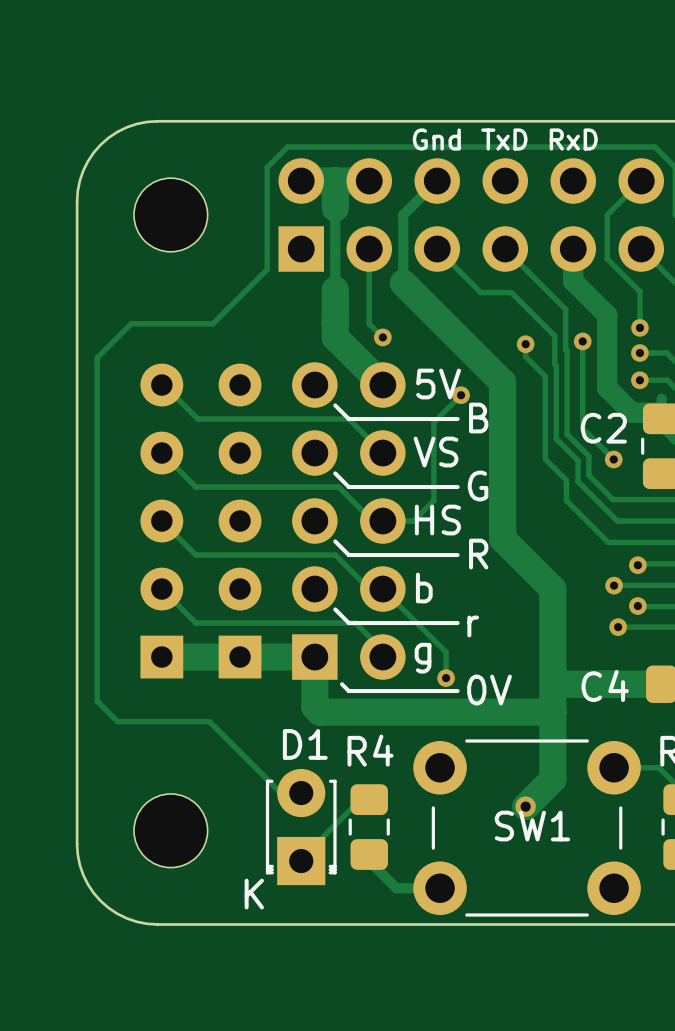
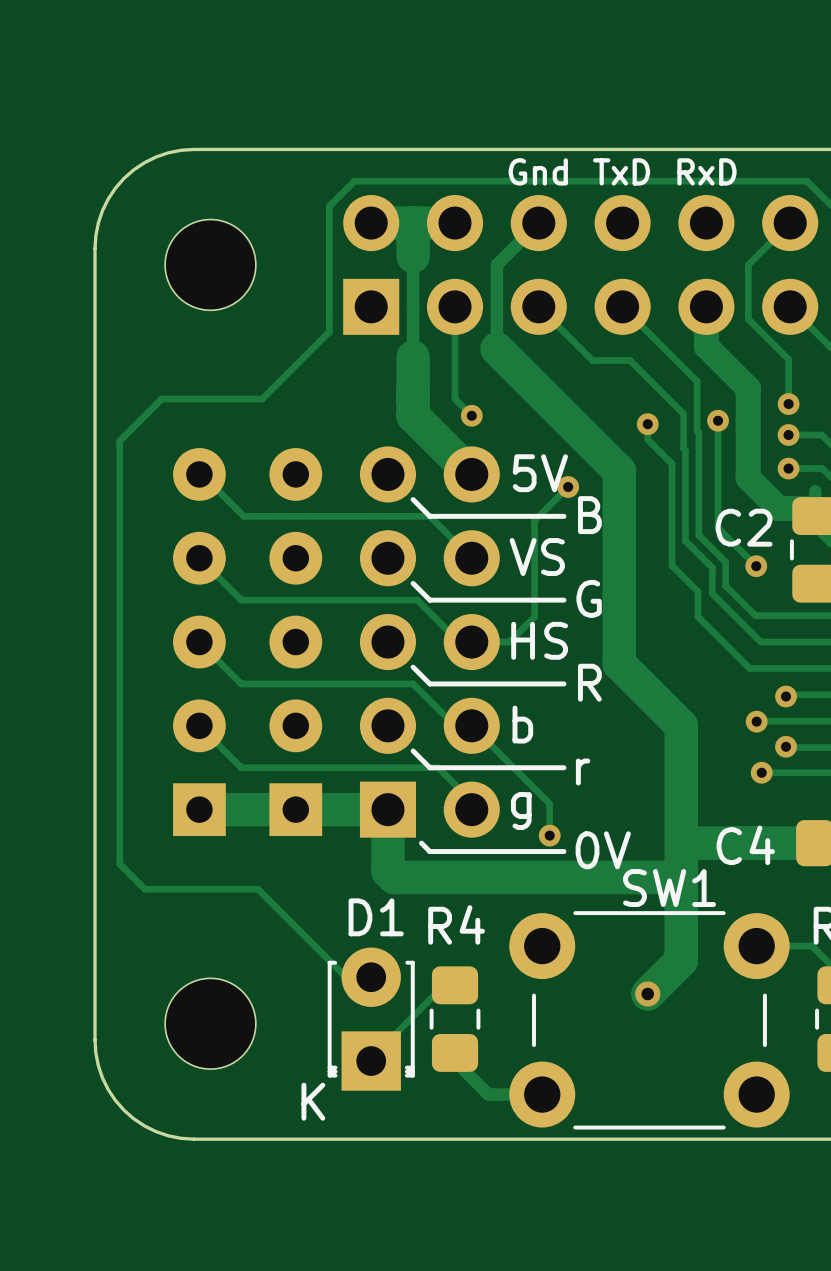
SW1 name position: SW1 (532, 826) -> SW1 (669, 888)

